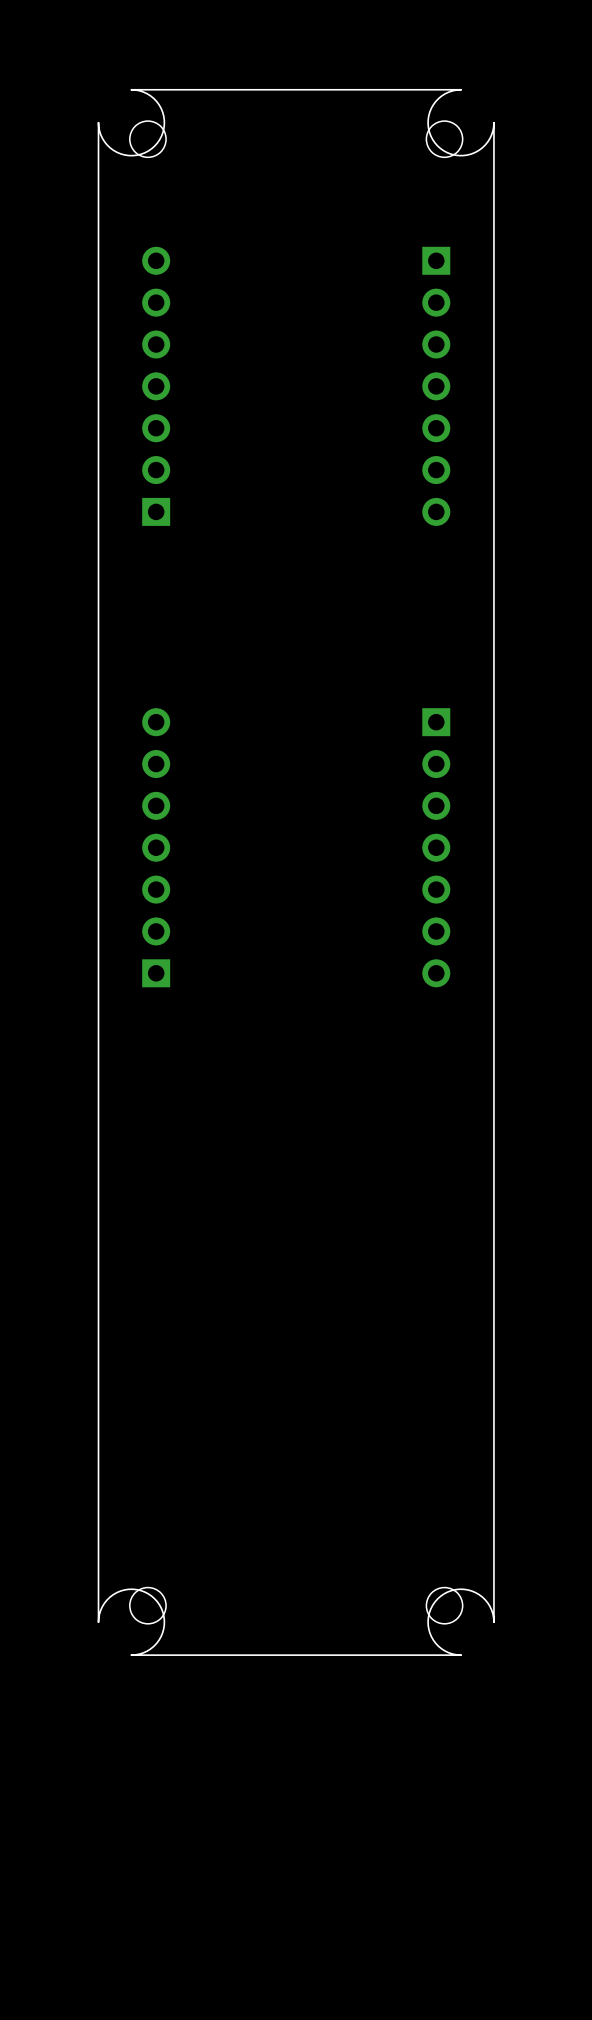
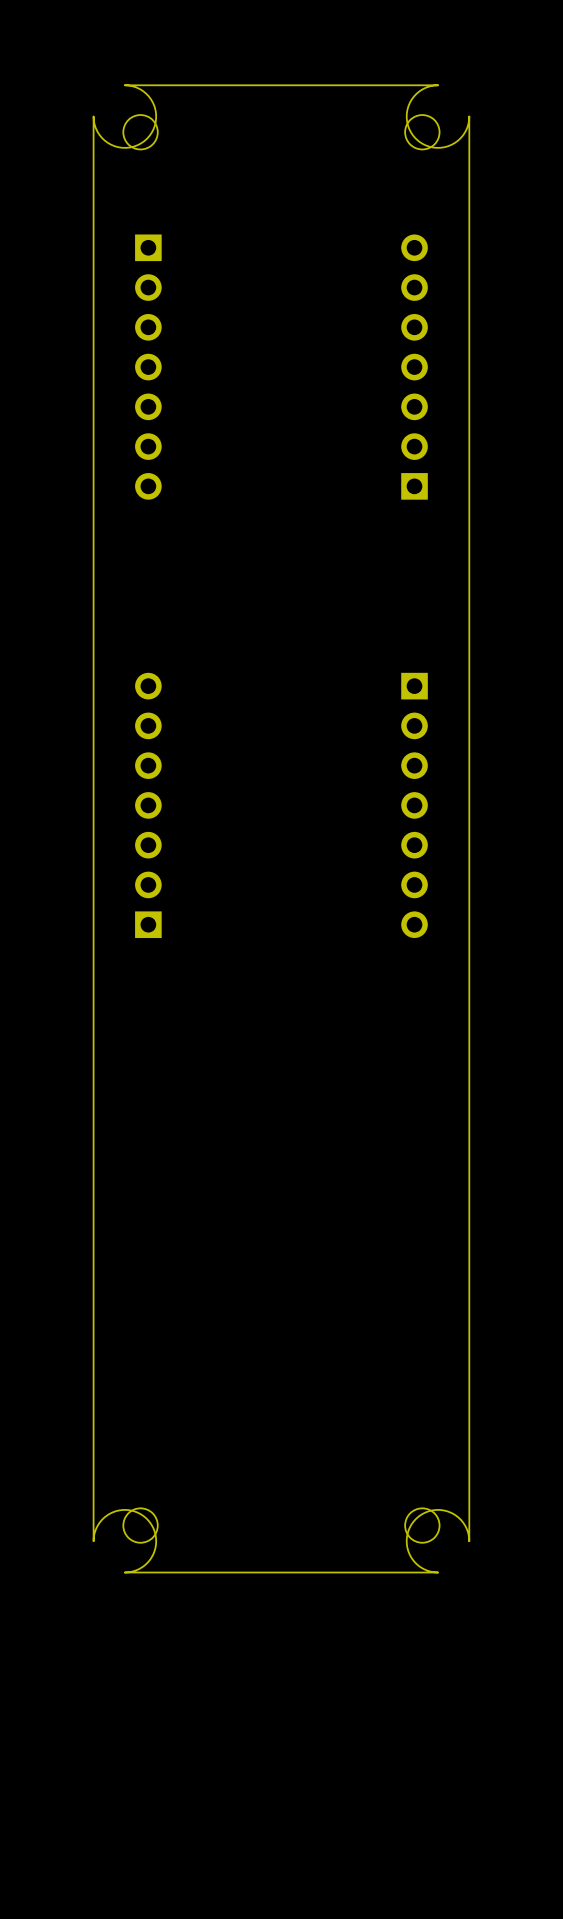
part rotation: 0° (156, 386) -> 180° (148, 367)
part rotation: 0° (436, 386) -> 180° (414, 367)

